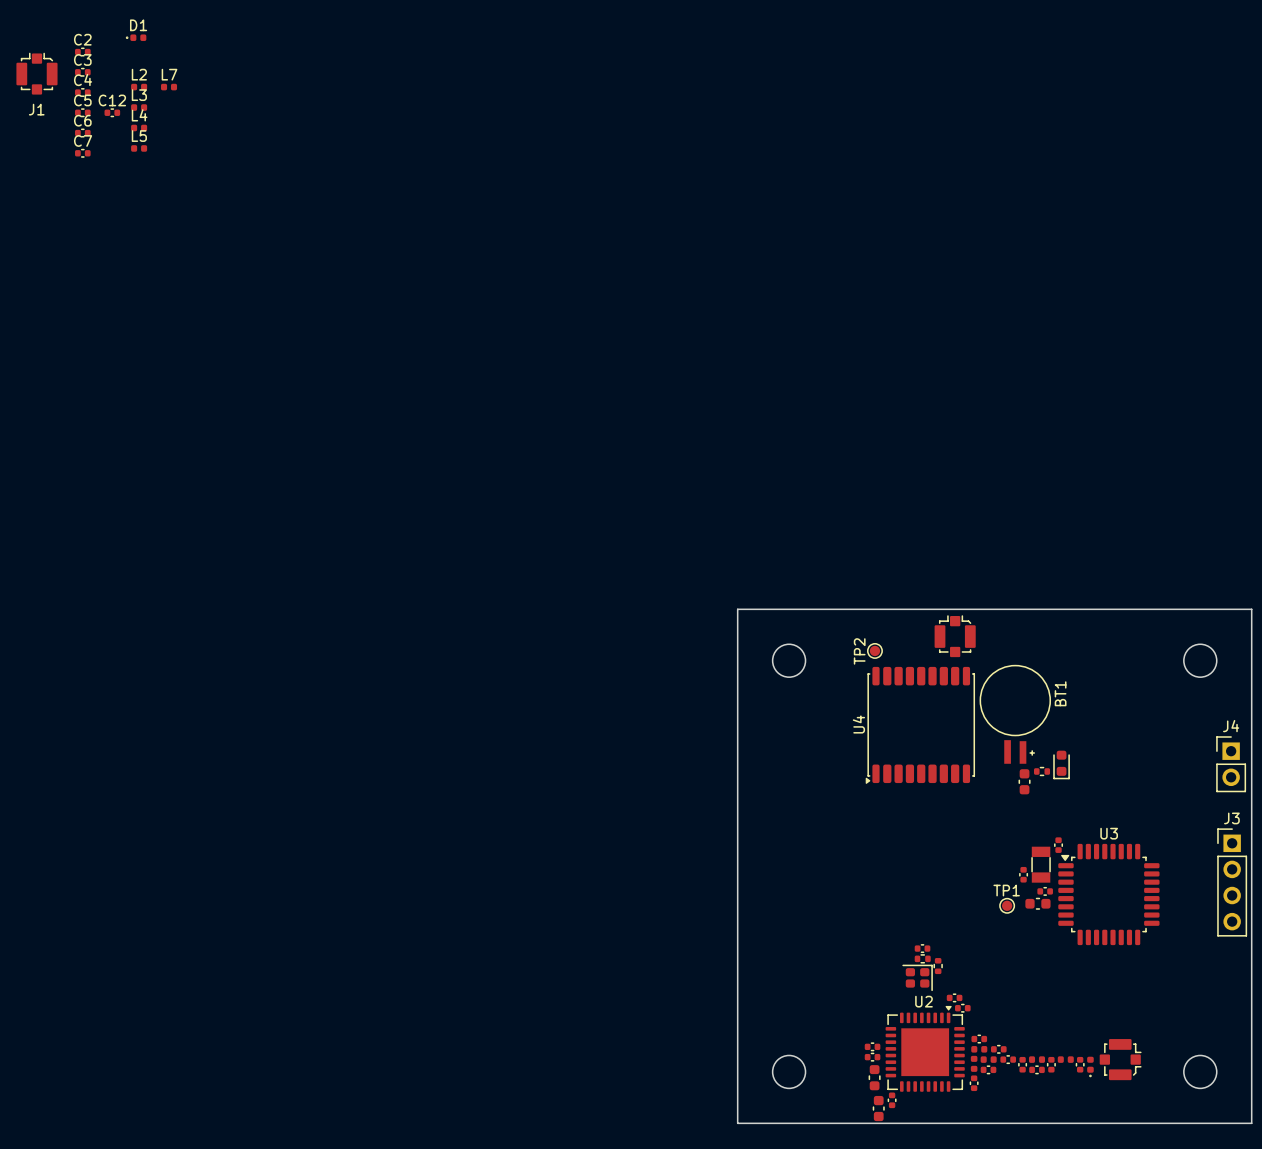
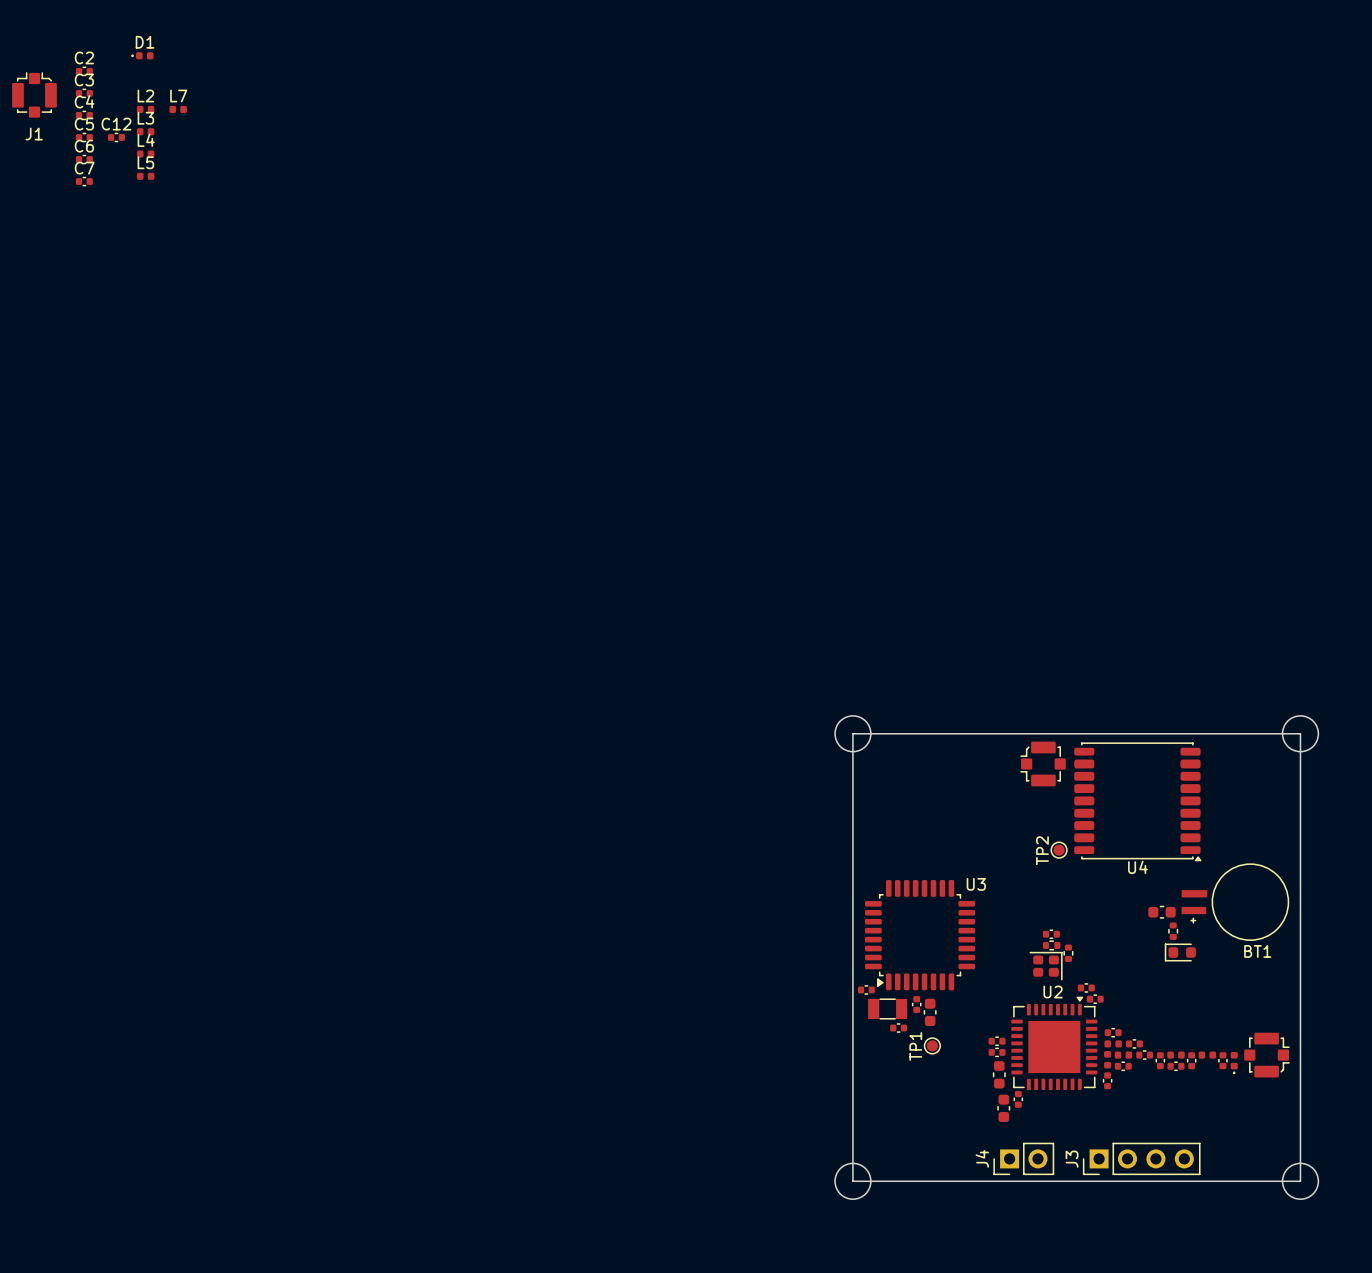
board edge: (737, 609) (1251, 609) (1251, 1123) (737, 1123) (737, 609) -> (852, 733) (852, 1181) (1300, 1181) (1300, 733) (852, 733)
part rotation: 0° (955, 636) -> 90° counterclockwise (1043, 763)
part position: (955, 636) -> (1043, 763)
TP2 position: (874, 650) -> (1059, 850)
BT1 rotation: 0° (1015, 714) -> 90° clockwise (1235, 902)
BT1 position: (1015, 714) -> (1235, 902)
U4 rotation: 0° (920, 725) -> 90° counterclockwise (1137, 801)
U4 position: (920, 725) -> (1137, 801)
part rotation: 0° (1061, 764) -> 90° clockwise (1180, 952)
part position: (1061, 764) -> (1180, 952)
J4 rotation: 0° (1231, 764) -> 90° counterclockwise (1023, 1158)
J4 position: (1231, 764) -> (1023, 1158)
part: (1042, 771) -> none
part: (1024, 781) -> none
part: none -> (1162, 912)
U3 name position: U3 (1109, 833) -> U3 (976, 884)
part: none -> (1173, 931)
part: none -> (1051, 934)
part: (1058, 845) -> none
part: none -> (1051, 945)
part: none -> (1068, 953)
part rotation: 0° (1041, 864) -> 90° clockwise (887, 1008)
part position: (1041, 864) -> (887, 1008)
part: none -> (1046, 966)
part: (1023, 874) -> none
J3 rotation: 0° (1232, 882) -> 90° counterclockwise (1141, 1158)
J3 position: (1232, 882) -> (1141, 1158)
TP1 name rotation: 0° (1006, 890) -> 90° counterclockwise (915, 1046)
part: (1045, 891) -> none
part: none -> (1086, 987)
U3 rotation: 0° (1108, 894) -> 90° counterclockwise (920, 935)
U3 position: (1108, 894) -> (920, 935)
part: none -> (866, 989)
part: (1037, 903) -> none
part: none -> (1095, 999)
TP1 position: (1007, 905) -> (932, 1045)
part: none -> (916, 1004)
part: none -> (930, 1012)
part: none -> (898, 1028)
part: none -> (1113, 1032)
part: none -> (997, 1041)
part: none -> (1113, 1043)
part: none -> (1134, 1043)
part: (922, 948) -> none
part: none -> (997, 1052)
part: none -> (1123, 1055)
part: none -> (1144, 1055)
part: none -> (1176, 1055)
part: none -> (1207, 1055)
part: (922, 958) -> none
part: none -> (1107, 1059)
part: none -> (1160, 1060)
part: none -> (1191, 1060)
part: none -> (1222, 1060)
part footprint: [902, 964, 933, 991] -> [992, 1061, 1006, 1089]
part: (938, 966) -> none
part: none -> (1123, 1066)
part: none -> (1176, 1066)
part: none -> (1107, 1080)
part: none -> (1018, 1099)
part: (954, 997) -> none
part: none -> (1003, 1108)
part: (962, 1008) -> none
part: (979, 1039) -> none
part: (872, 1046) -> none
U2 position: (925, 1048) -> (1054, 1043)
part: (979, 1049) -> none
part: (998, 1049) -> none
part: (872, 1057) -> none
part: (988, 1059) -> none
part: (1008, 1059) -> none
part: (1036, 1059) -> none
part: (1065, 1059) -> none
part position: (1120, 1059) -> (1266, 1055)
part: (974, 1063) -> none
part: (1022, 1064) -> none
part: (1051, 1064) -> none
part: (1080, 1064) -> none
part position: (1090, 1066) -> (1234, 1062)
part: (988, 1069) -> none
part: (1036, 1069) -> none
part: (874, 1077) -> none
part: (974, 1083) -> none
part: (892, 1100) -> none
part: (878, 1108) -> none

